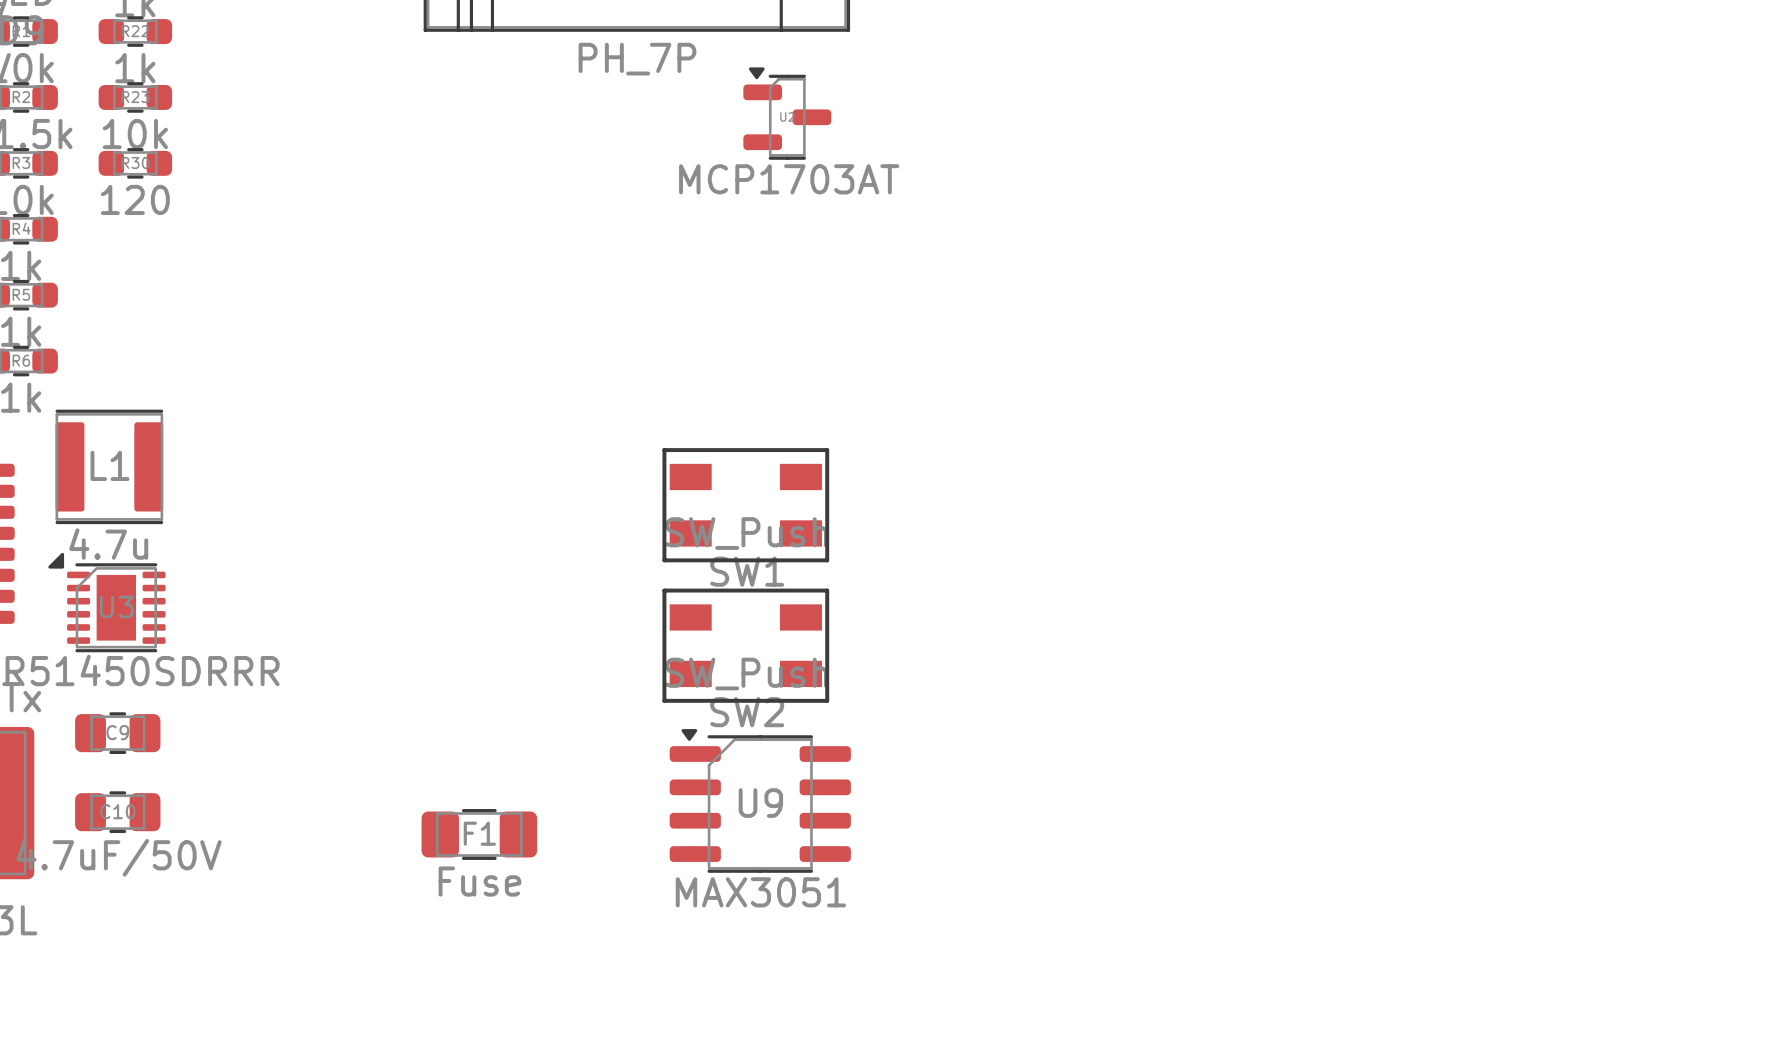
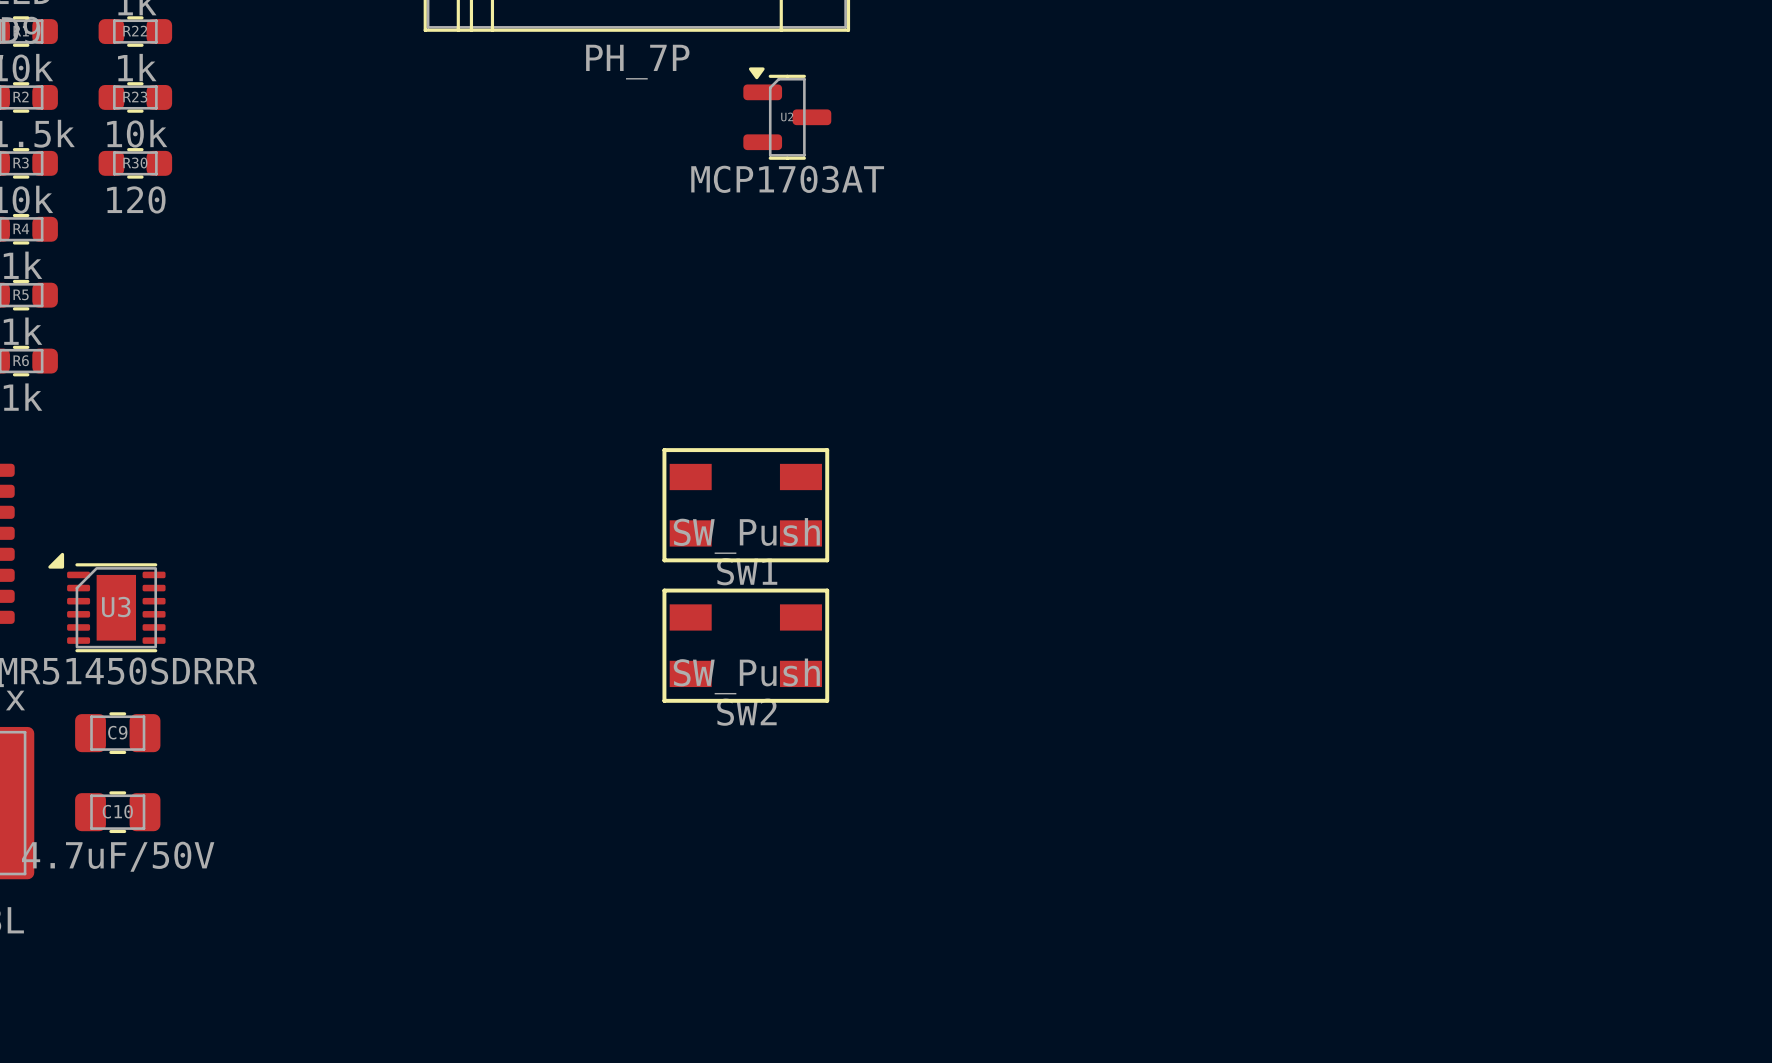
L1: 4.7u (109, 466) -> none
U9: MAX3051 (760, 800) -> none
F1: Fuse (479, 834) -> none

